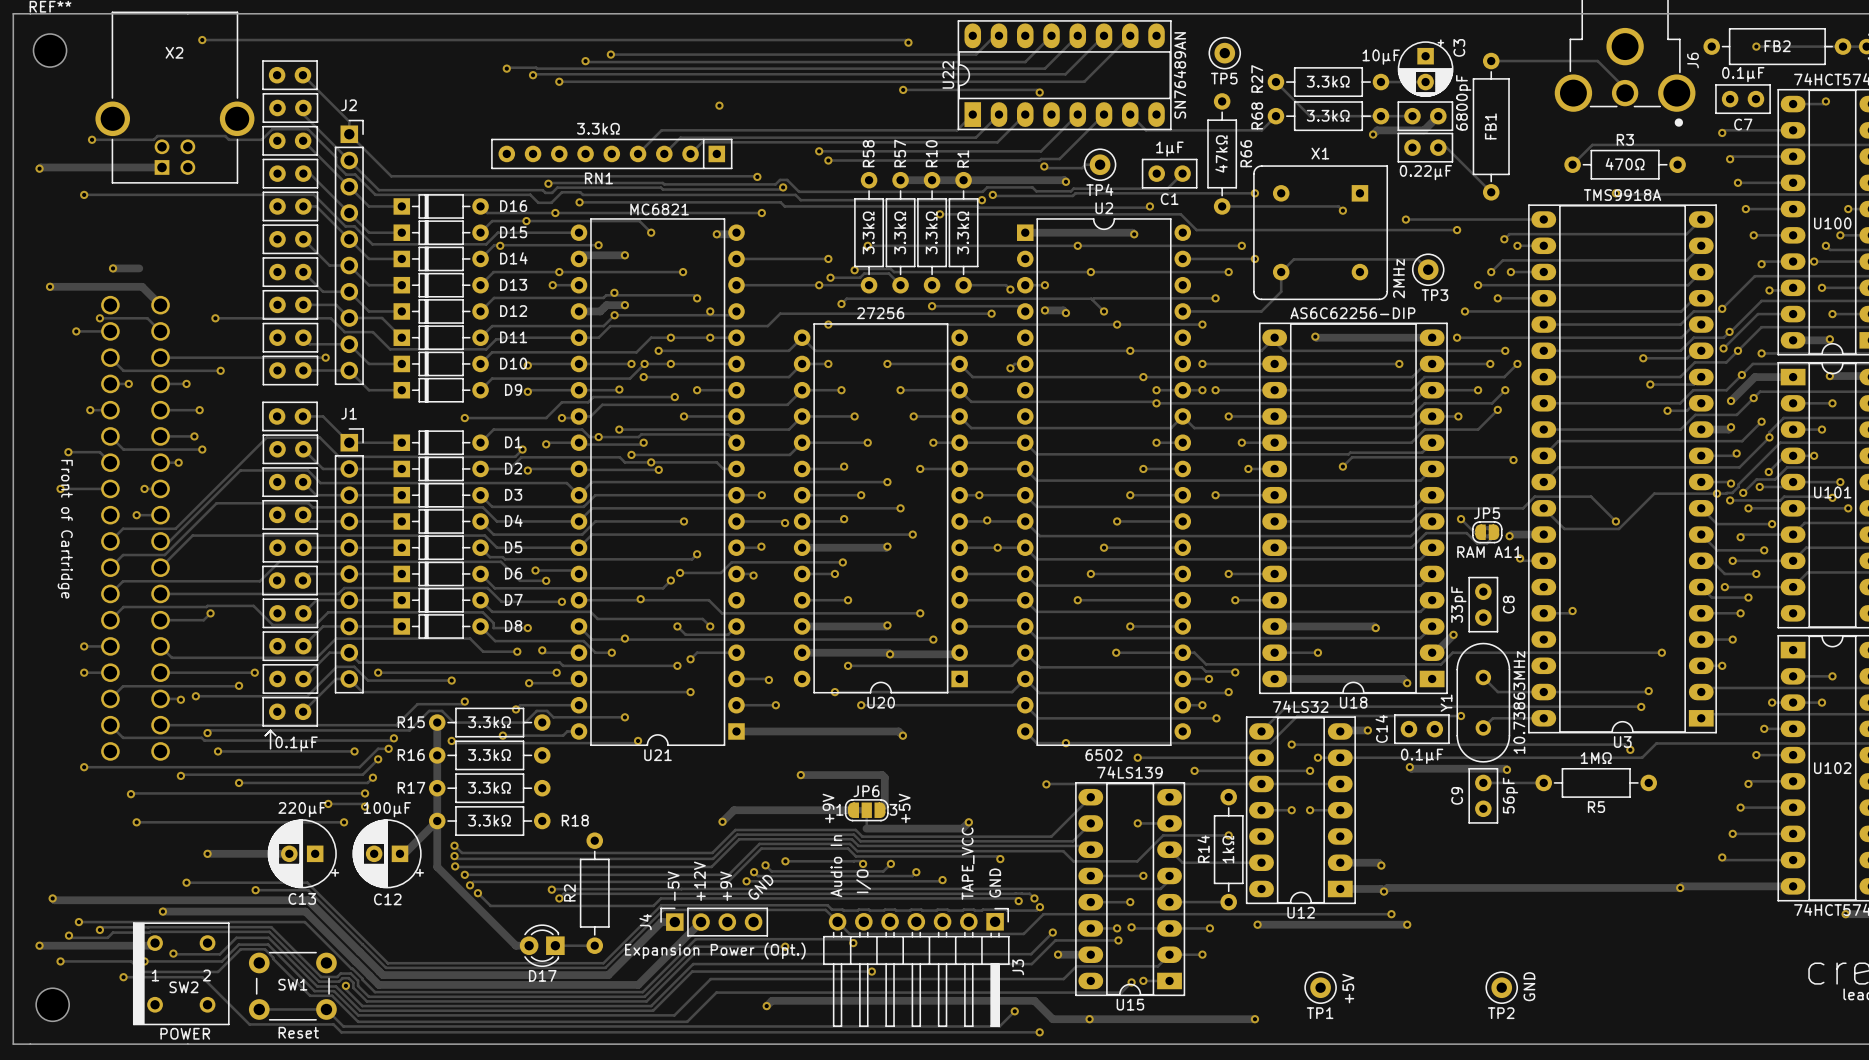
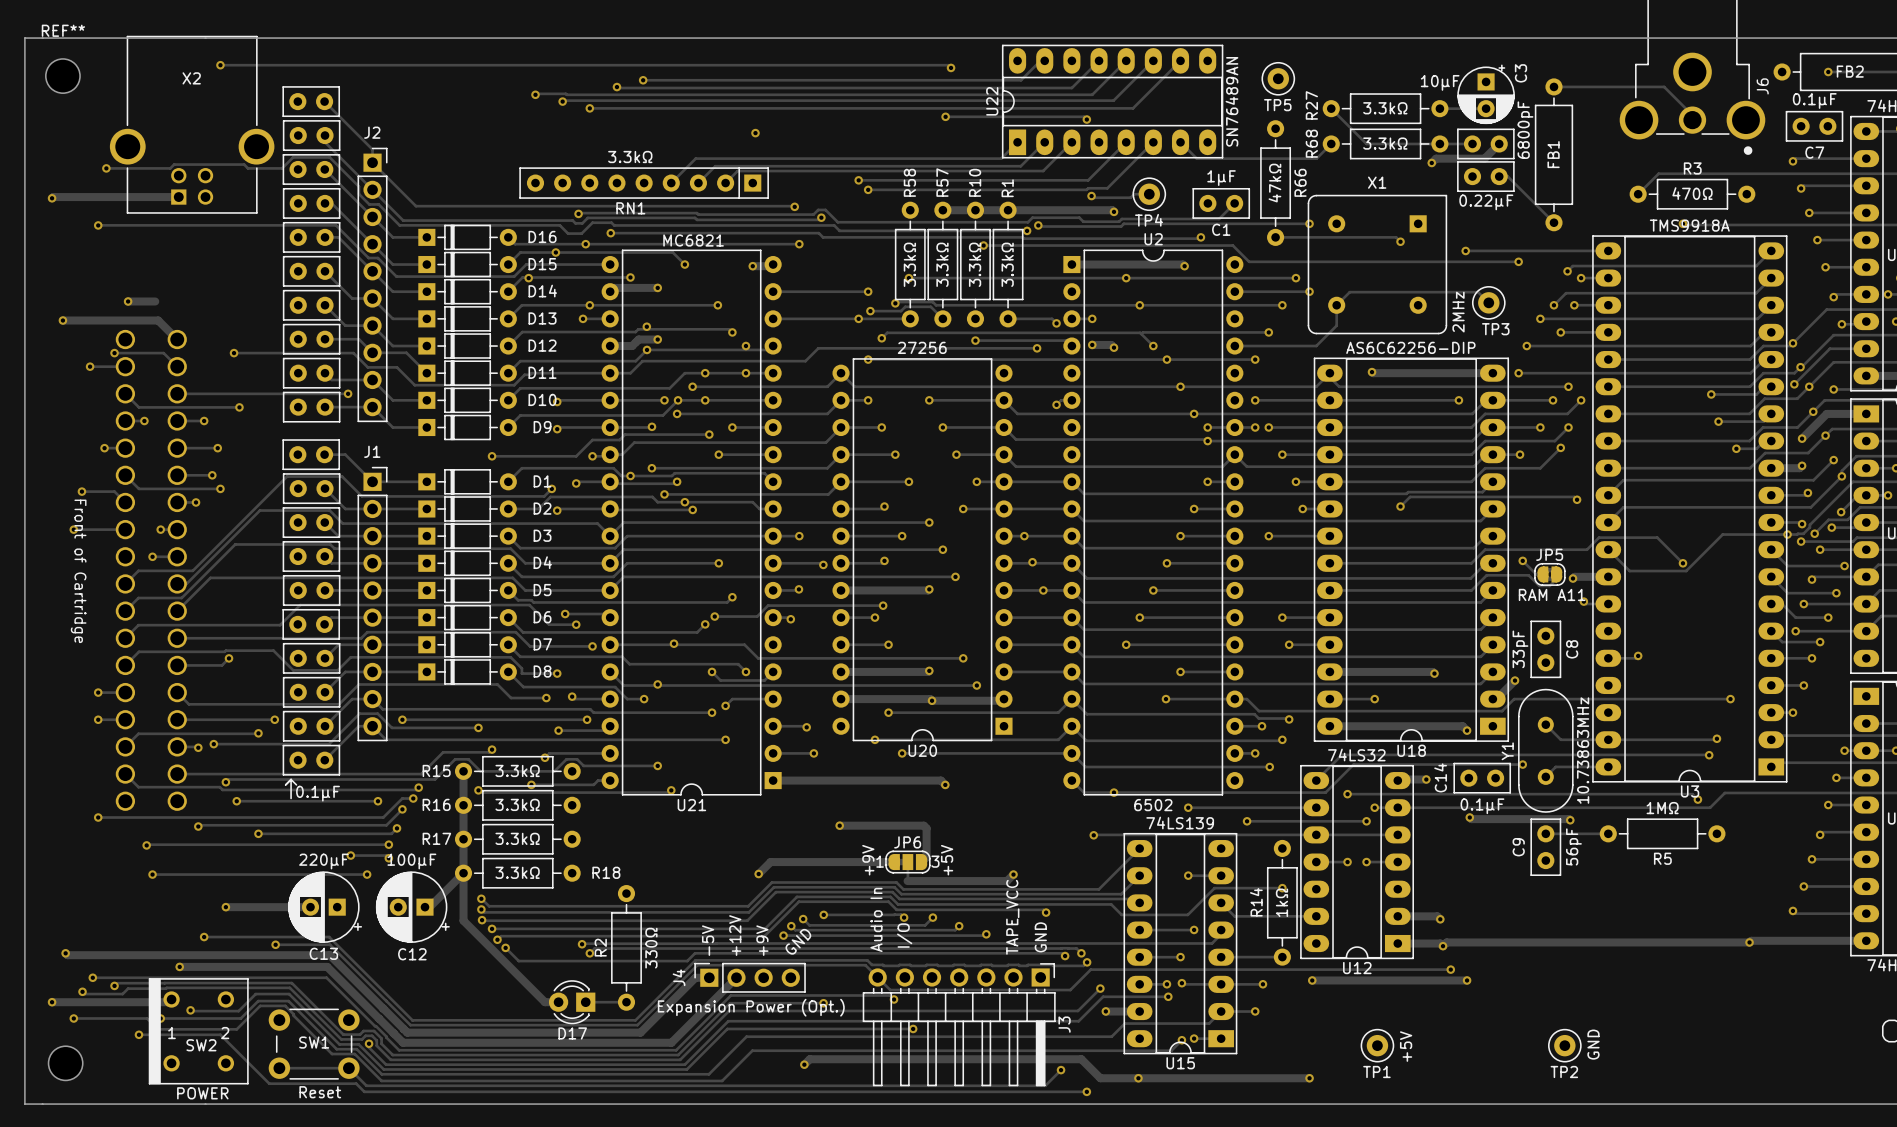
R2 value: none -> 330Ω (651, 948)

